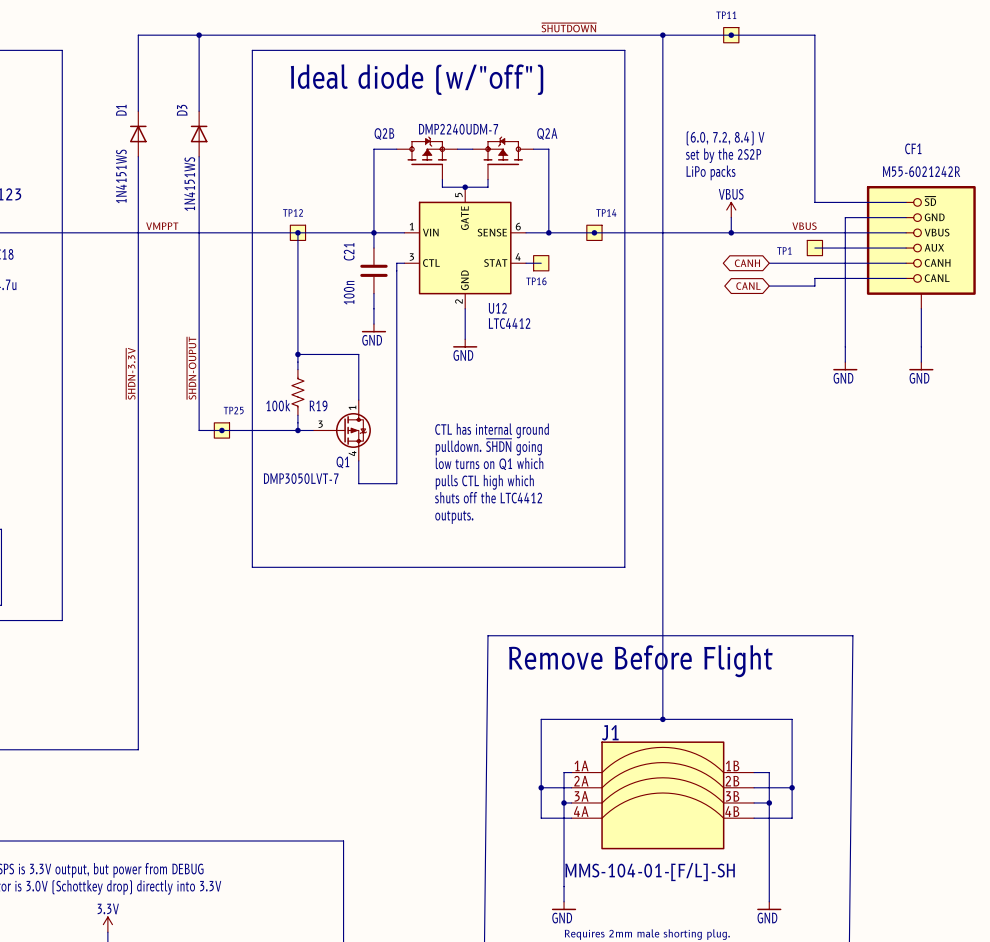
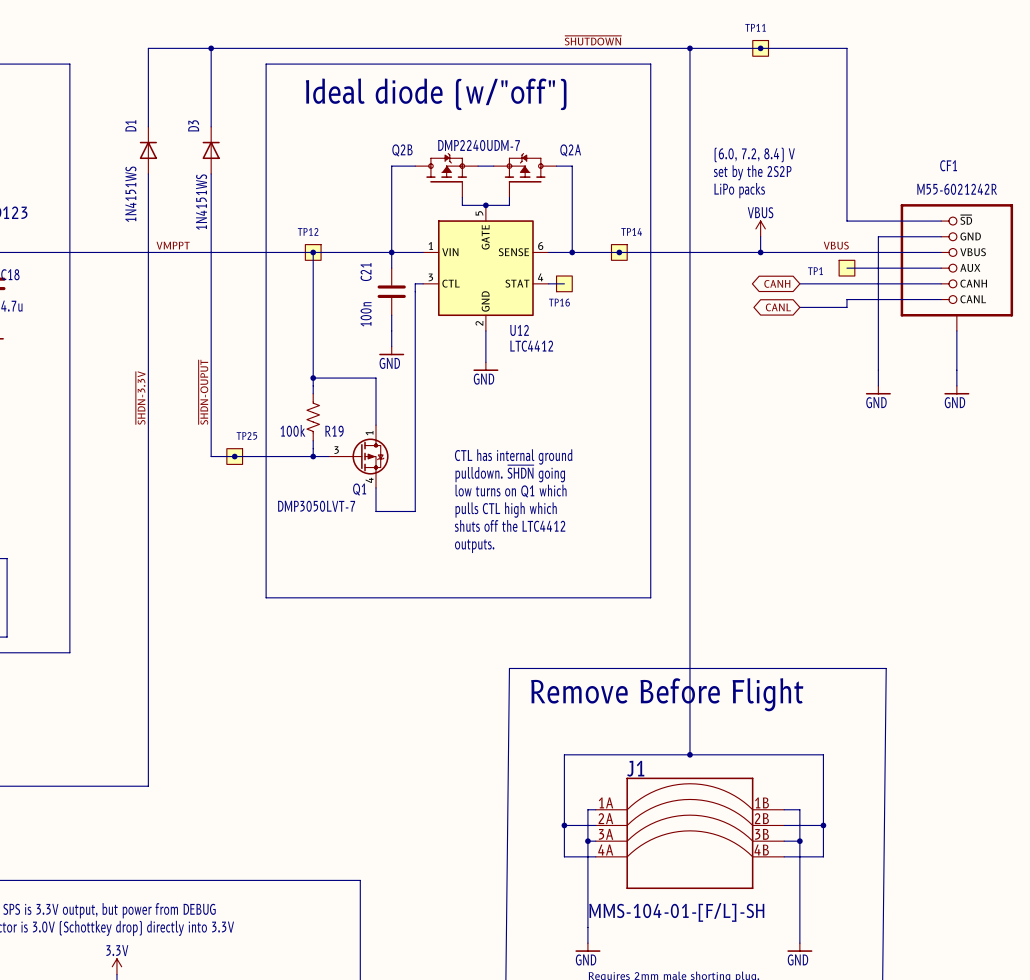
CF1 symbol: [866, 186, 976, 309] -> [900, 204, 1014, 331]
J1 symbol: [571, 741, 755, 850] -> [595, 777, 785, 890]

